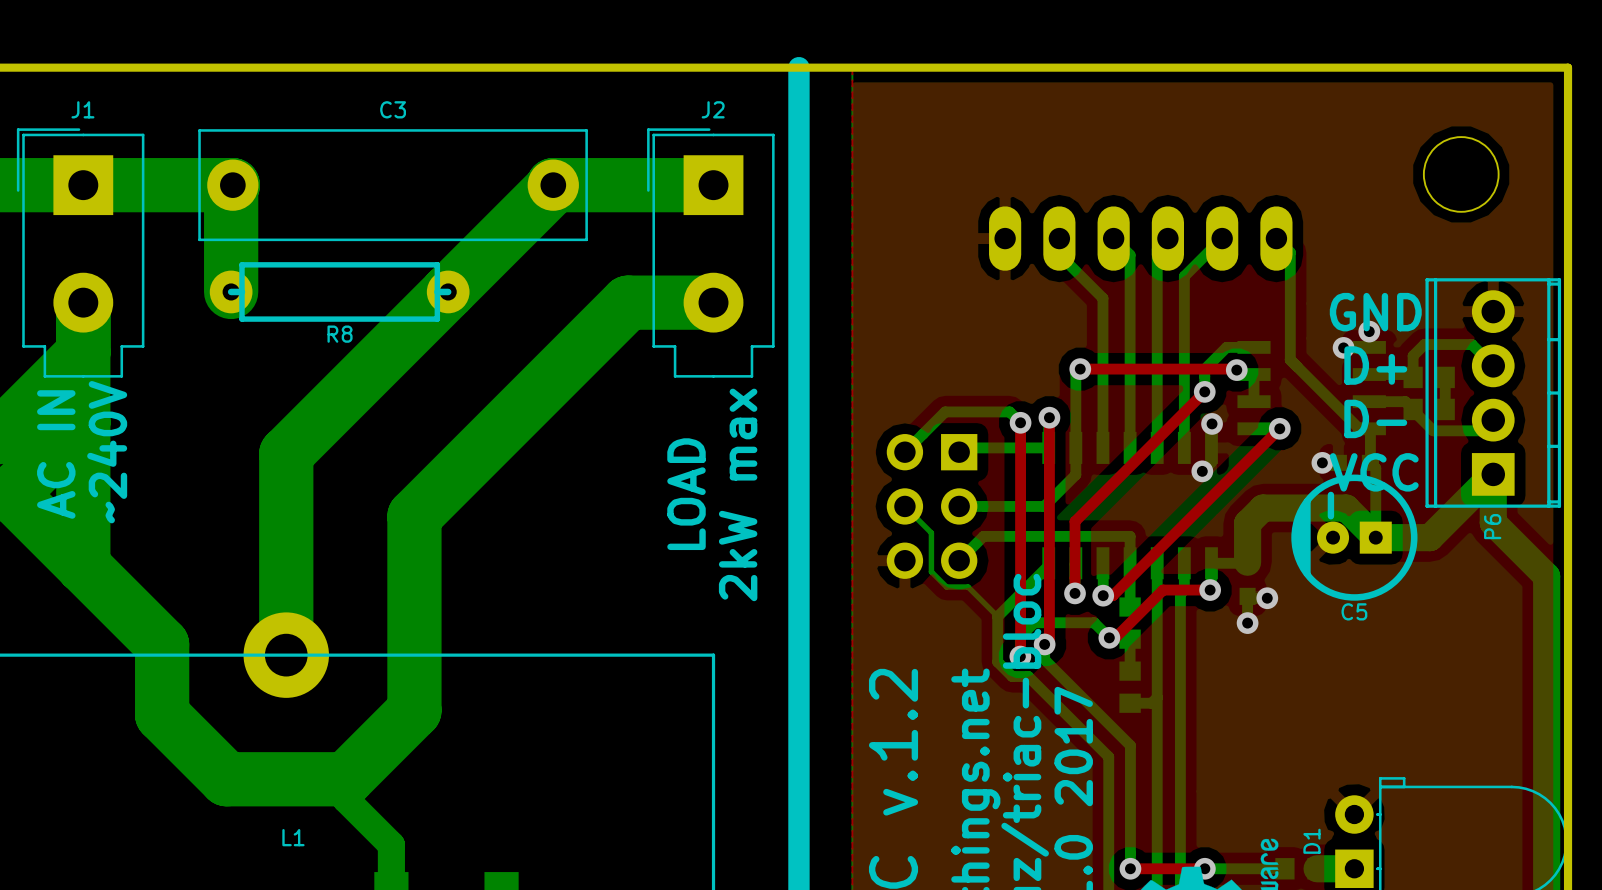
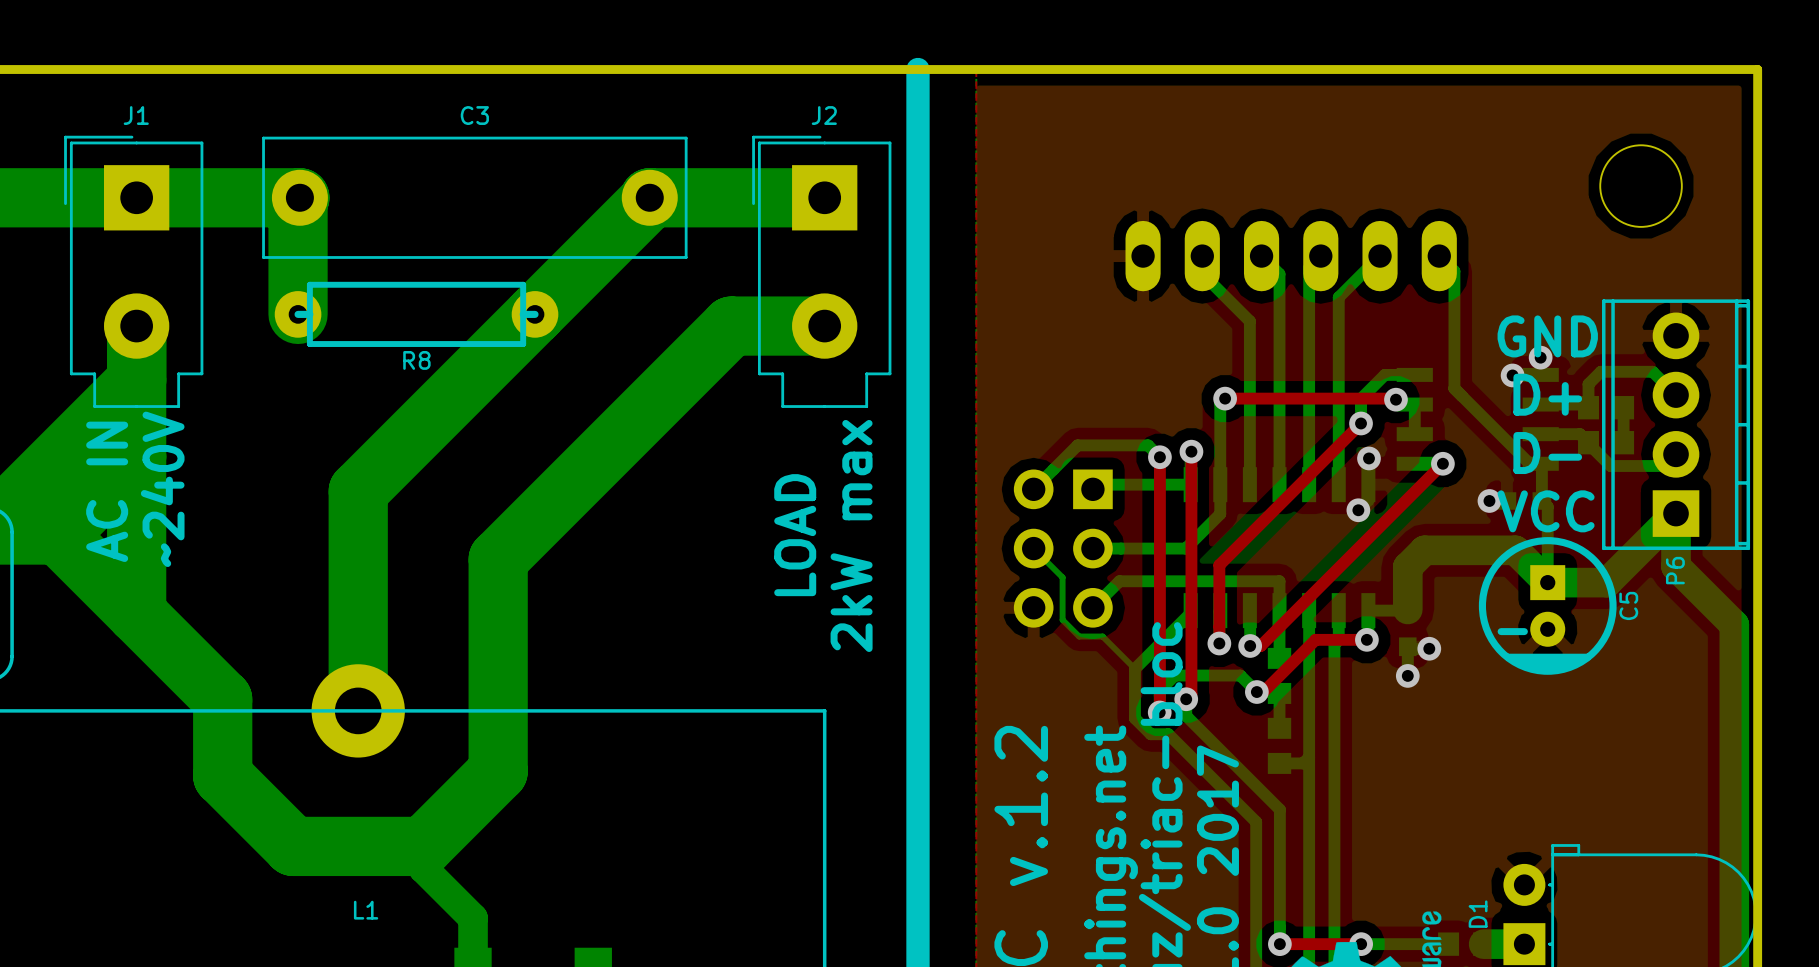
C5 rotation: 0° (1354, 537) -> 90° counterclockwise (1547, 605)

